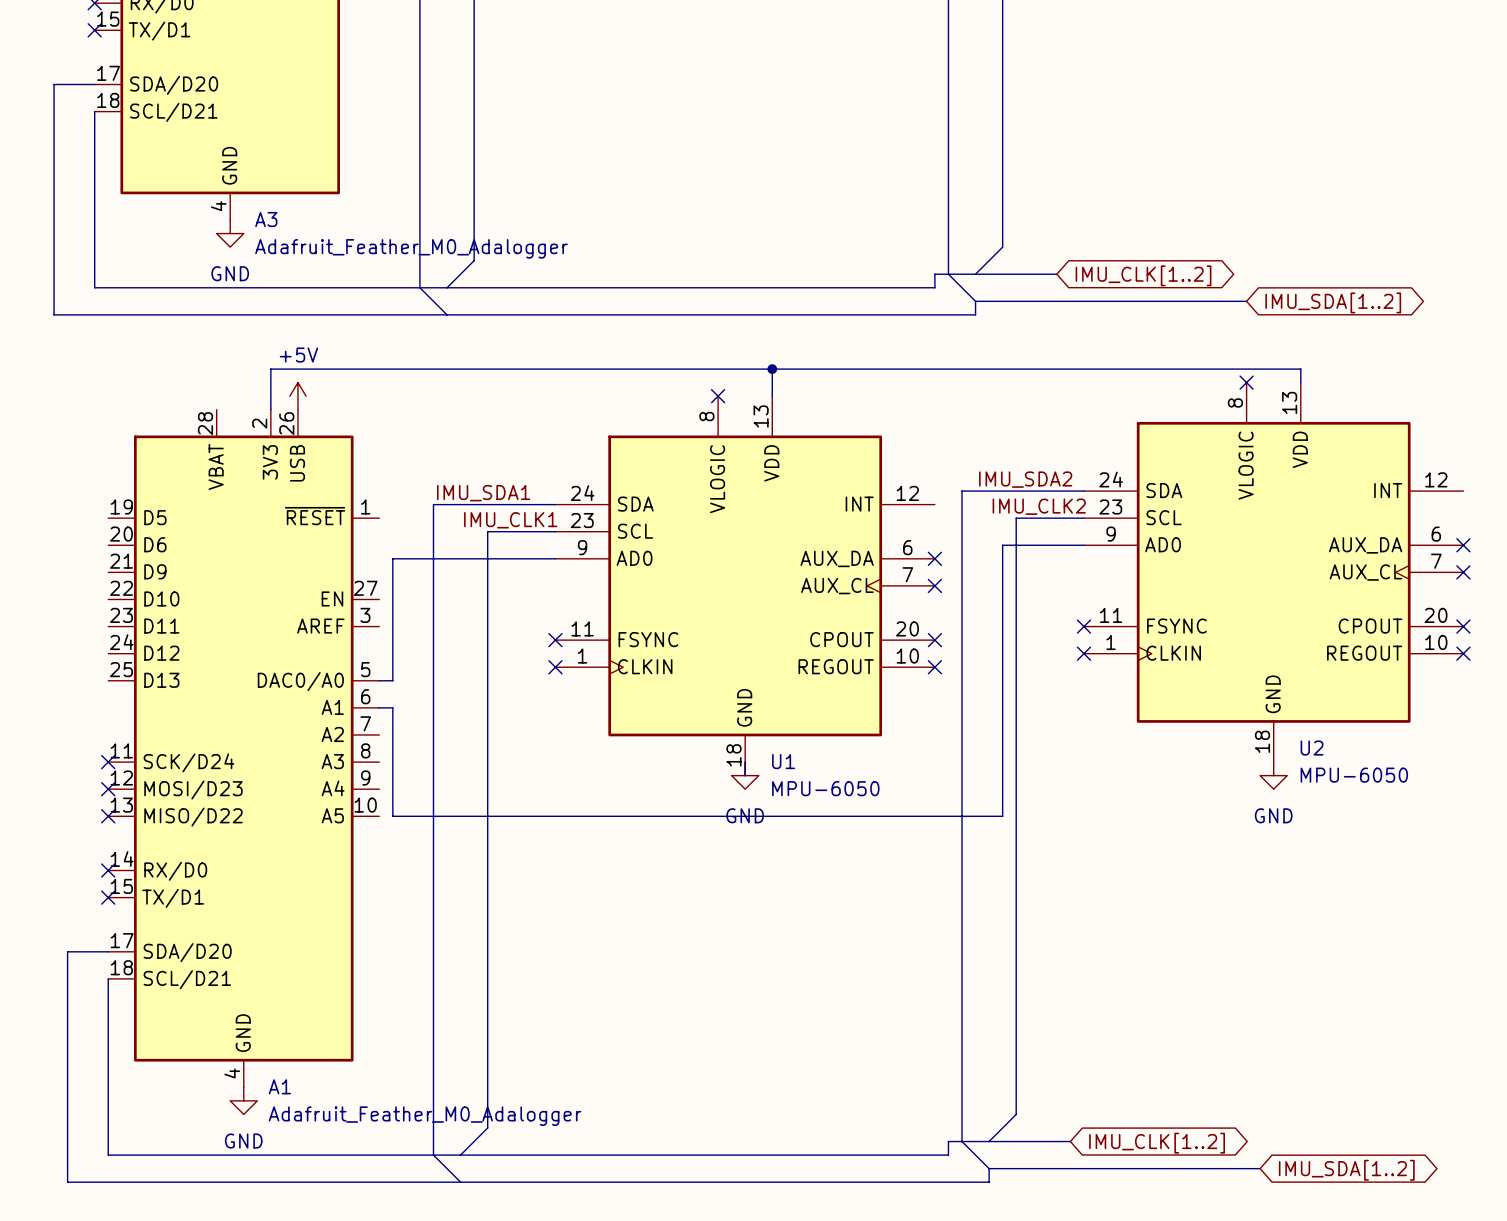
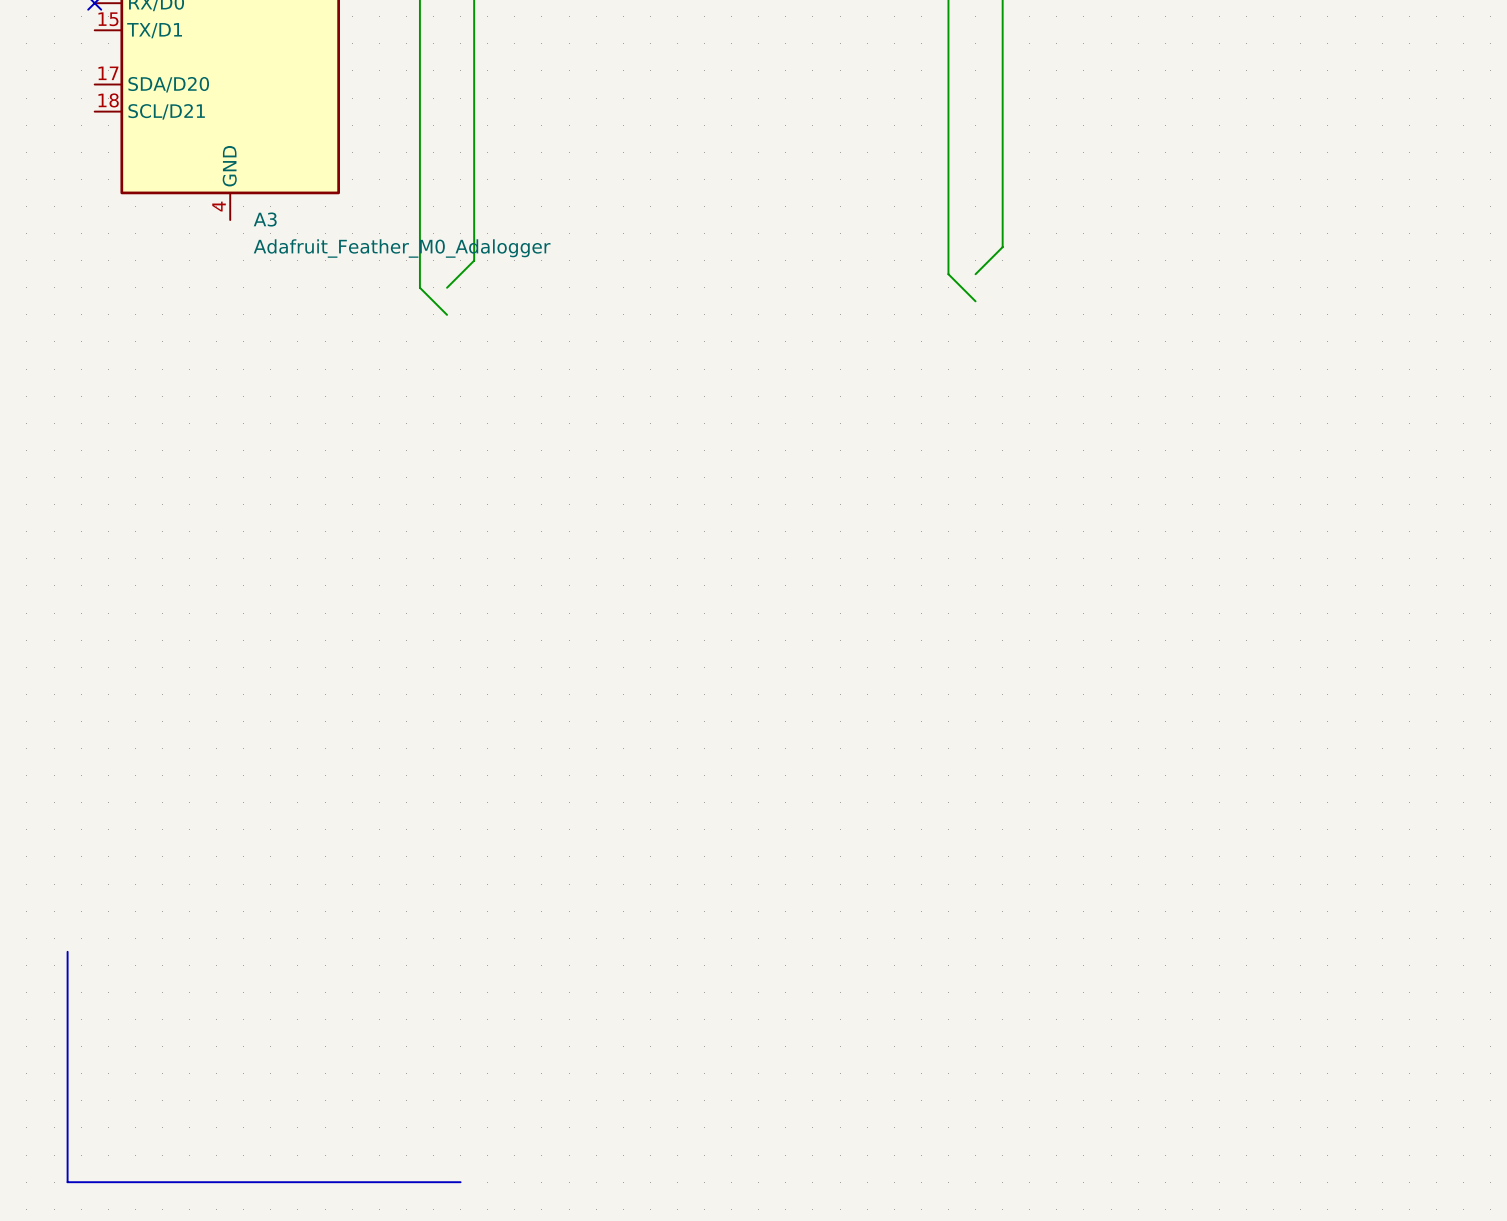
no-connect mark: (94, 30) -> none
bus: (94, 84) (54, 84) (54, 314) (975, 314) (975, 301) (1246, 301) -> none
bus: (94, 111) (94, 287) (934, 287) (934, 274) (1056, 274) -> none
power symbol: GND (230, 233) -> none
global label: IMU_CLK[1..2] (1143, 275) -> none
global label: IMU_SDA[1..2] (1333, 302) -> none
wire: (772, 369) (772, 396) -> none
junction: (772, 369) -> none
no-connect mark: (1246, 382) -> none
wire: (1300, 382) (1300, 369) (270, 369) (270, 409) -> none
power symbol: +5V (297, 396) -> none
no-connect mark: (718, 396) -> none
label: IMU_SDA2 (1025, 479) -> none
wire: (1083, 491) (962, 491) (962, 1141) (989, 1168) -> none
label: IMU_SDA1 (483, 493) -> none
wire: (555, 504) (433, 504) (433, 1155) (460, 1182) -> none
label: IMU_CLK2 (1039, 506) -> none
wire: (1083, 518) (1016, 518) (1016, 1114) (989, 1141) -> none
label: IMU_CLK1 (510, 520) -> none
wire: (555, 531) (487, 531) (487, 1127) (460, 1155) -> none
wire: (1083, 545) (1002, 545) (1002, 816) (392, 816) (392, 707) (379, 707) -> none
no-connect mark: (1463, 545) -> none
wire: (555, 558) (392, 558) (392, 680) (379, 680) -> none
no-connect mark: (934, 558) -> none
U2: MPU-6050 (1273, 572) -> none
no-connect mark: (1463, 572) -> none
U1: MPU-6050 (745, 585) -> none
no-connect mark: (934, 585) -> none
no-connect mark: (1083, 626) -> none
no-connect mark: (1463, 626) -> none
no-connect mark: (555, 640) -> none
no-connect mark: (934, 640) -> none
no-connect mark: (1083, 653) -> none
no-connect mark: (1463, 653) -> none
no-connect mark: (555, 667) -> none
no-connect mark: (934, 667) -> none
A1: Adafruit_Feather_M0_Adalogger (243, 748) -> none
no-connect mark: (108, 762) -> none
wire: (745, 762) (745, 775) -> none
power symbol: GND (745, 775) -> none
power symbol: GND (1273, 775) -> none
no-connect mark: (108, 789) -> none
no-connect mark: (108, 816) -> none
no-connect mark: (108, 870) -> none
no-connect mark: (108, 897) -> none
bus: (67, 951) (108, 951) -> none
bus: (108, 978) (108, 1155) (948, 1155) (948, 1141) (1070, 1141) -> none
power symbol: GND (243, 1100) -> none
global label: IMU_CLK[1..2] (1157, 1143) -> none
bus: (1260, 1168) (989, 1168) (989, 1182) (460, 1182) -> none
global label: IMU_SDA[1..2] (1346, 1170) -> none

